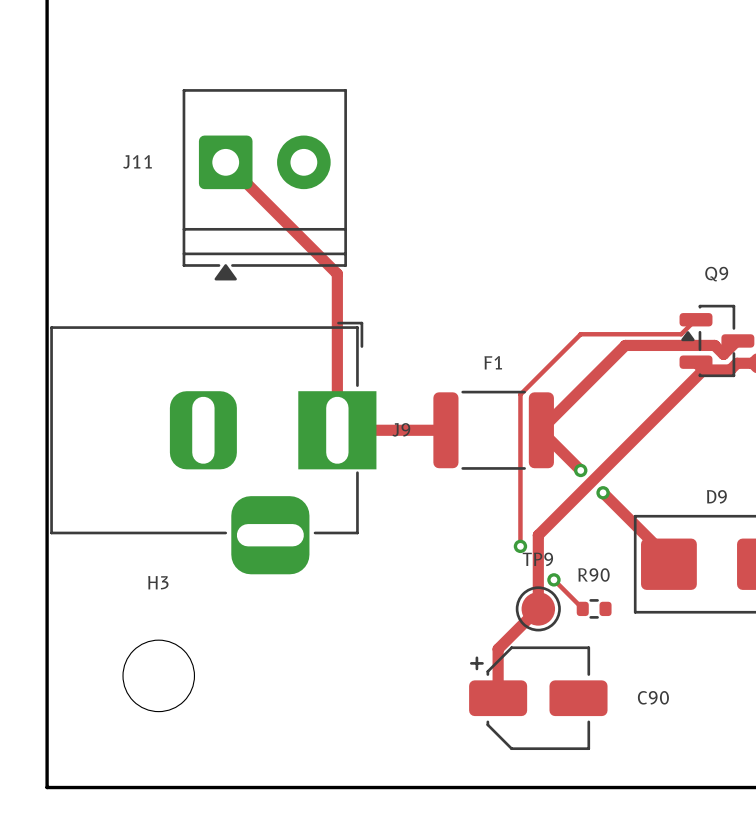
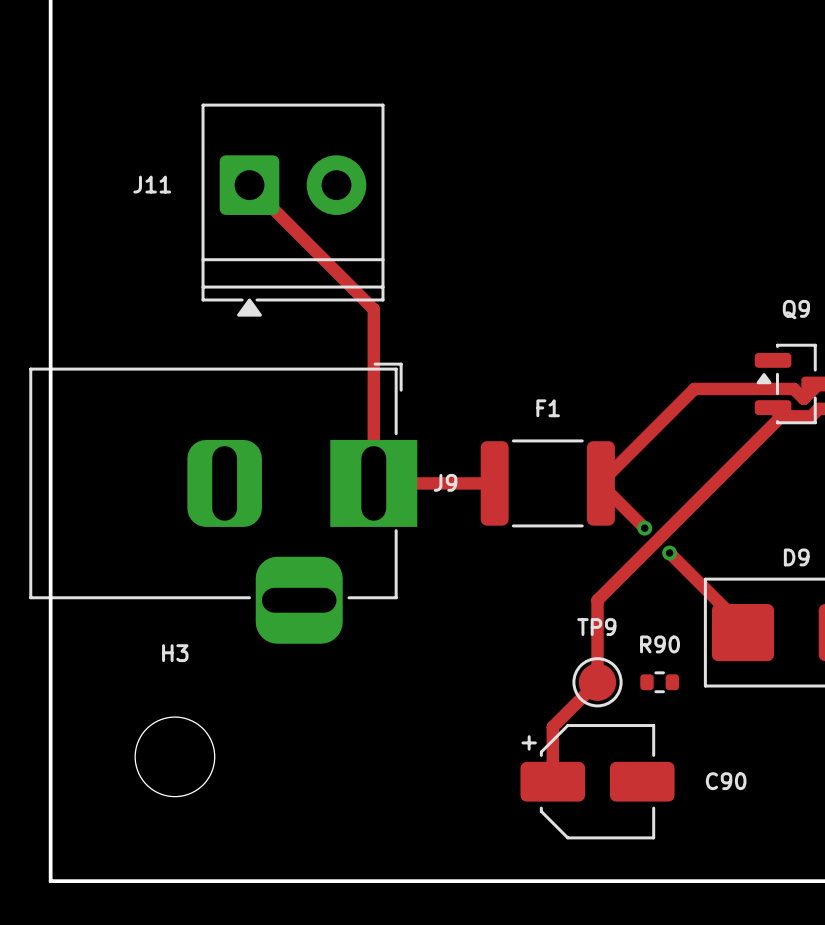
top track: (696, 319) (681, 334) (580, 334) (520, 394) (520, 546) -> none
J9 footprint: [50, 321, 377, 575] -> [29, 362, 418, 644]
via: (520, 546) -> none
top track: (553, 579) (582, 608) -> none
via: (553, 579) -> none

